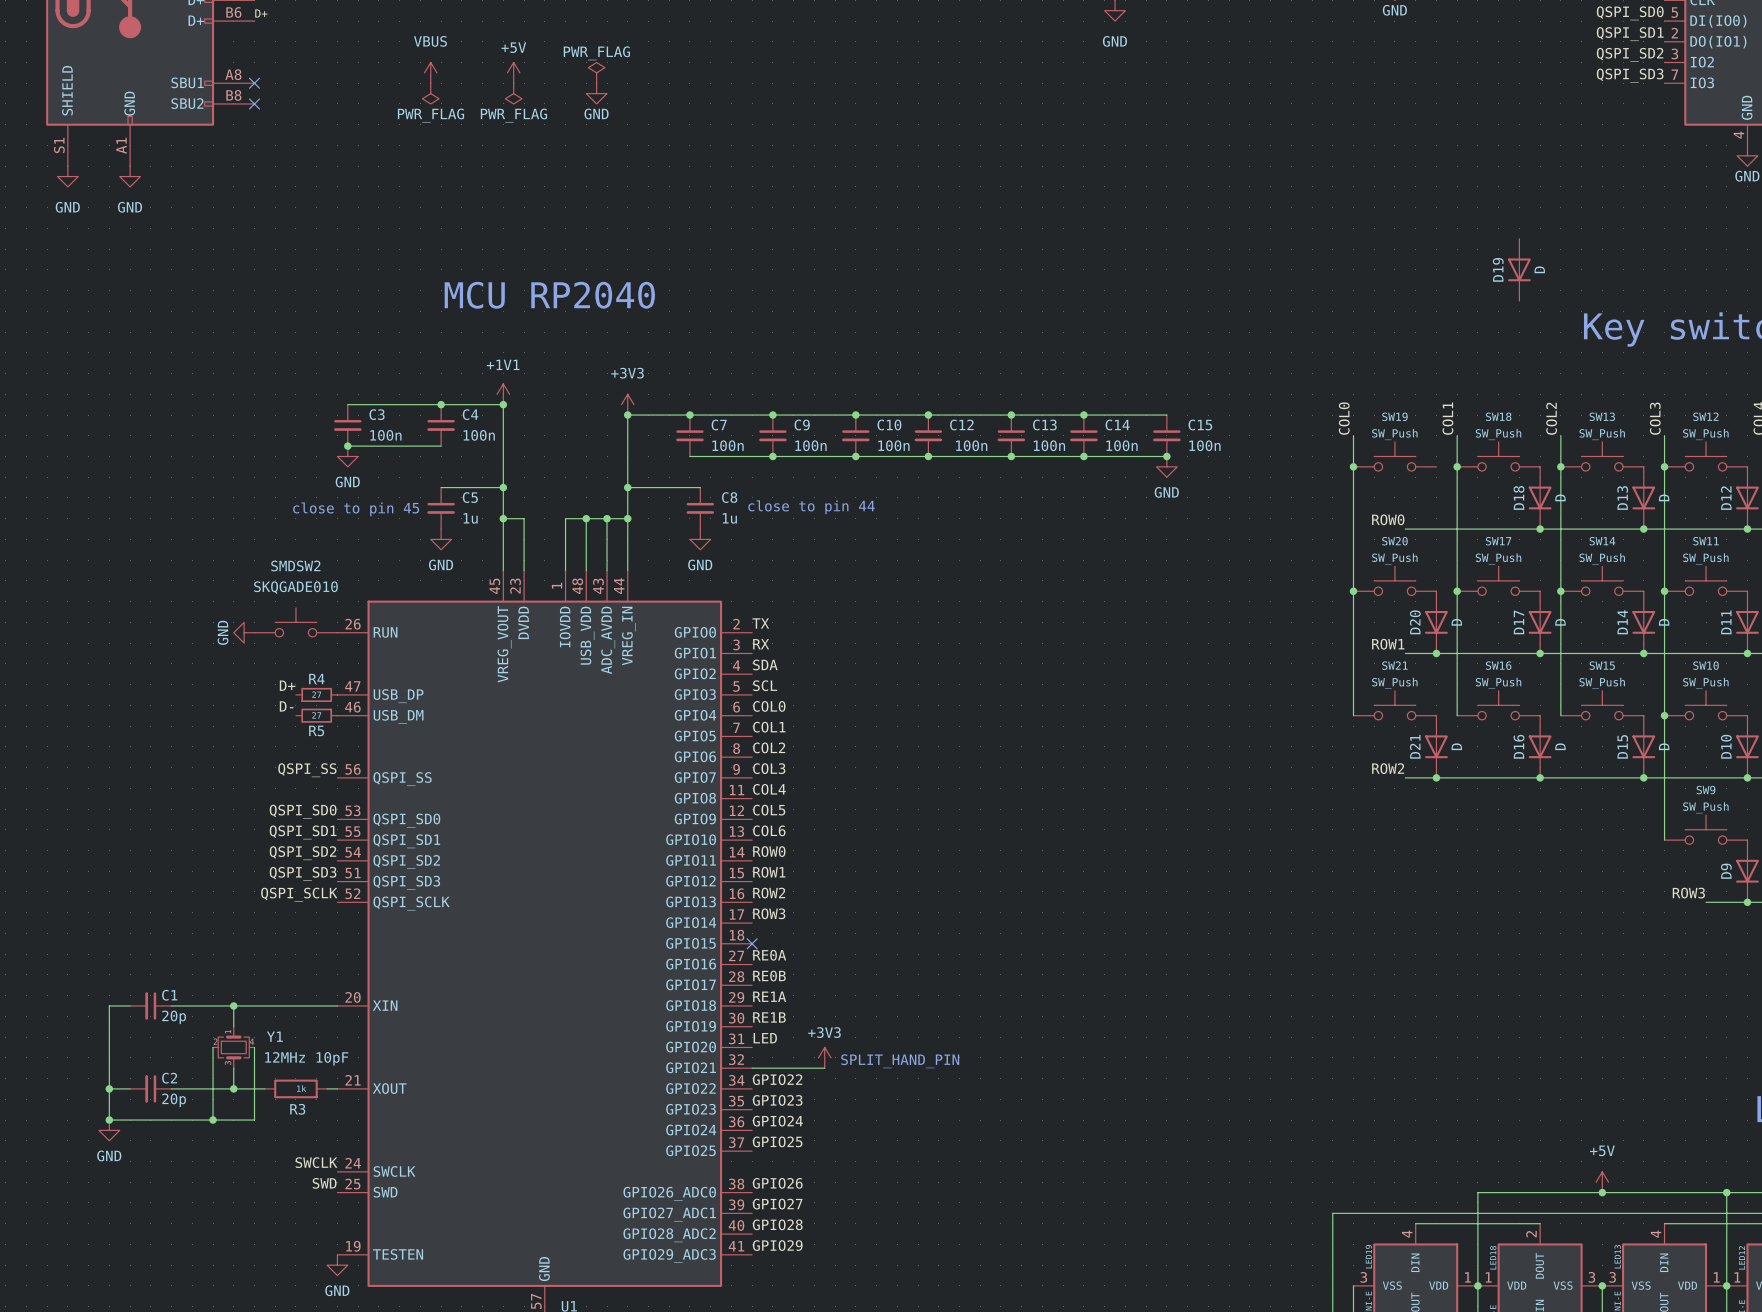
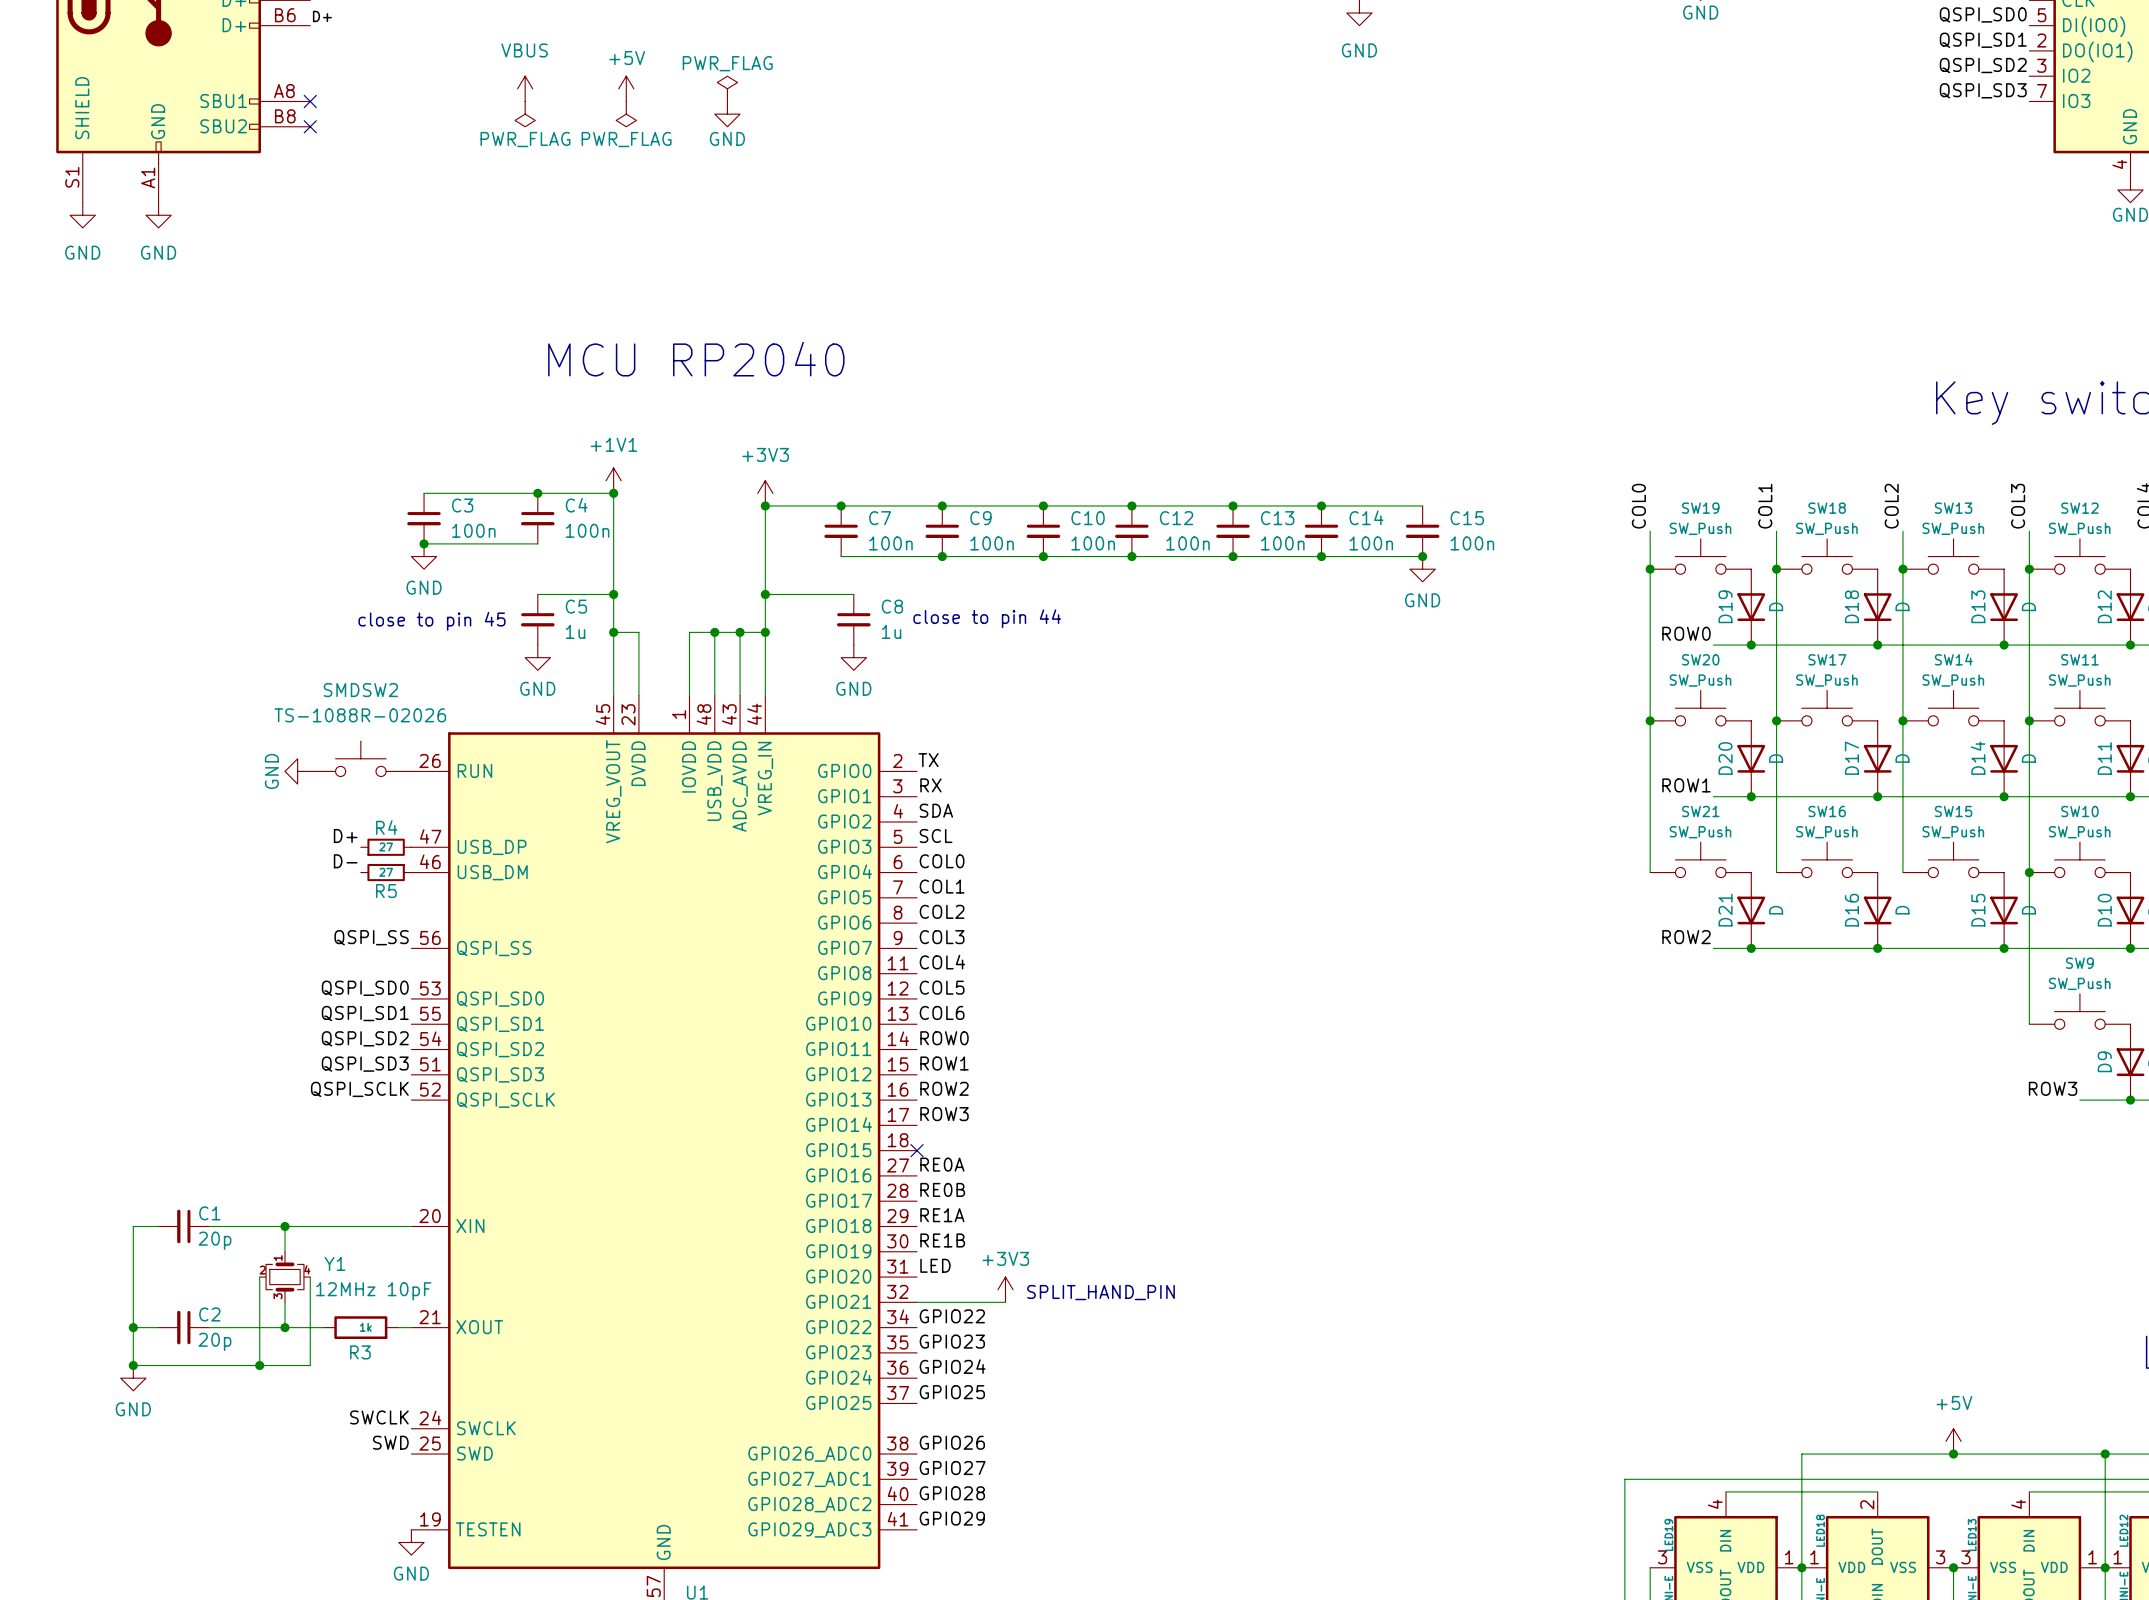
D19 position: (1519, 269) -> (1751, 607)
junction: none -> (1751, 645)
SMDSW2 value: SKQGADE010 (295, 587) -> TS-1088R-02026 (360, 715)

